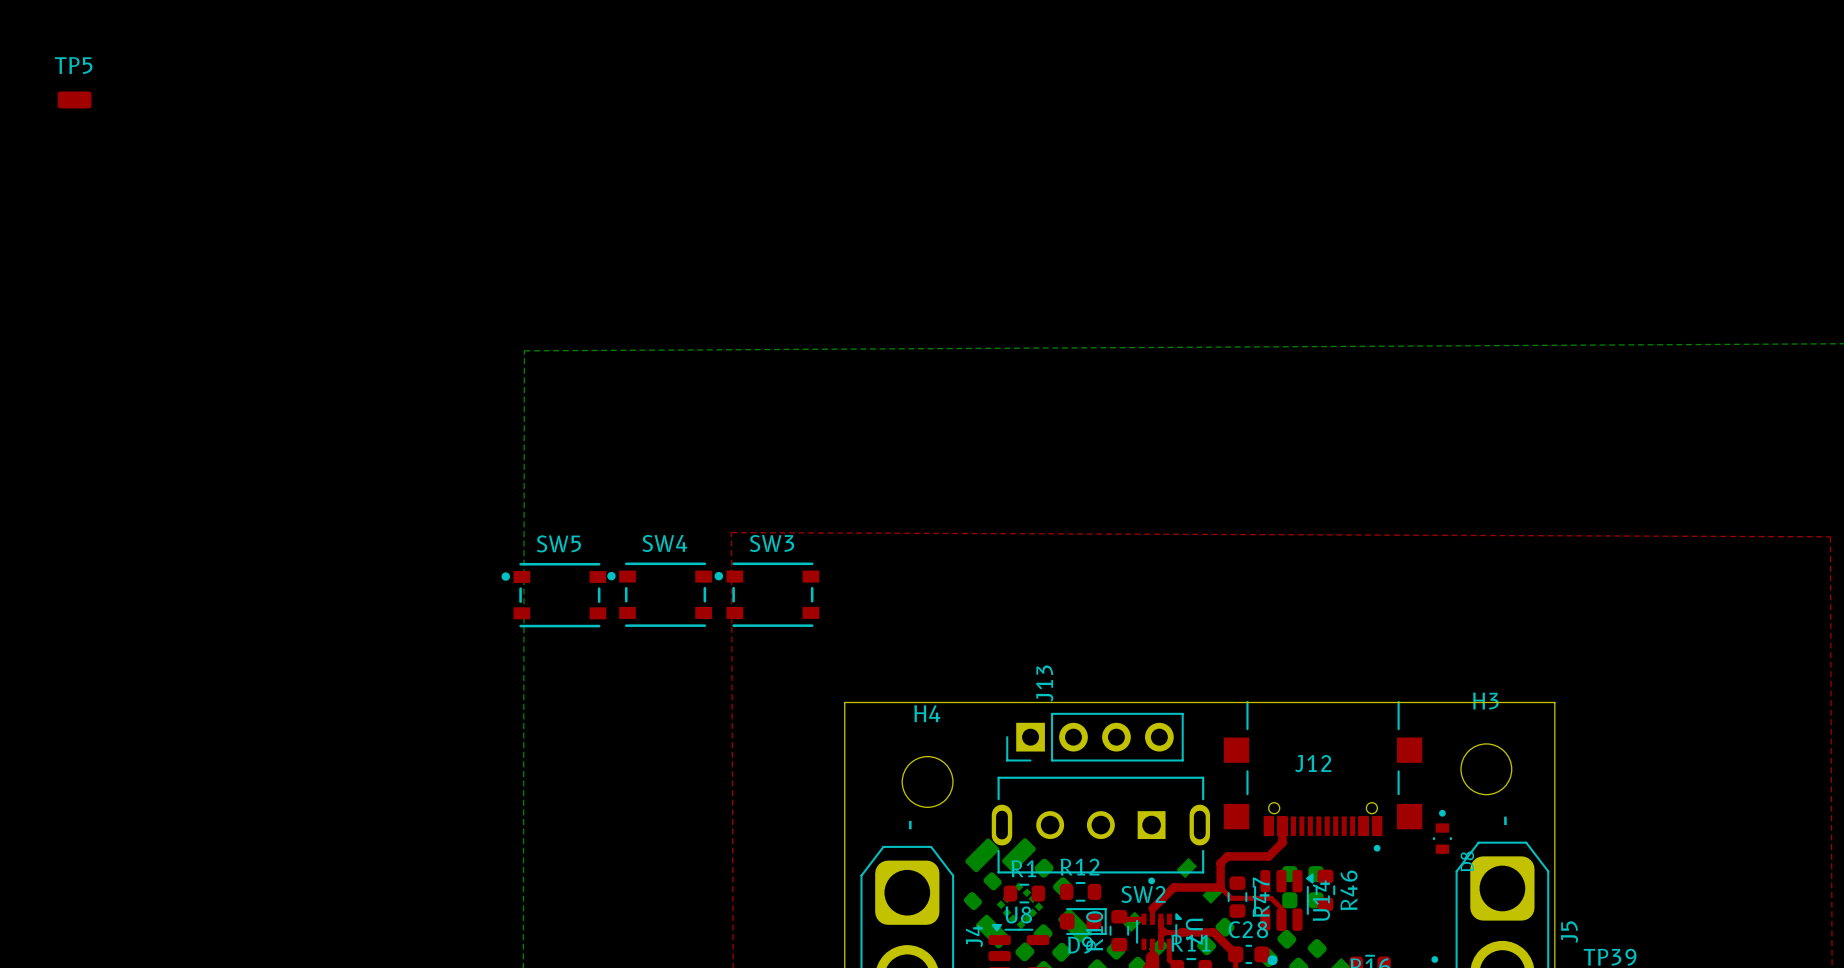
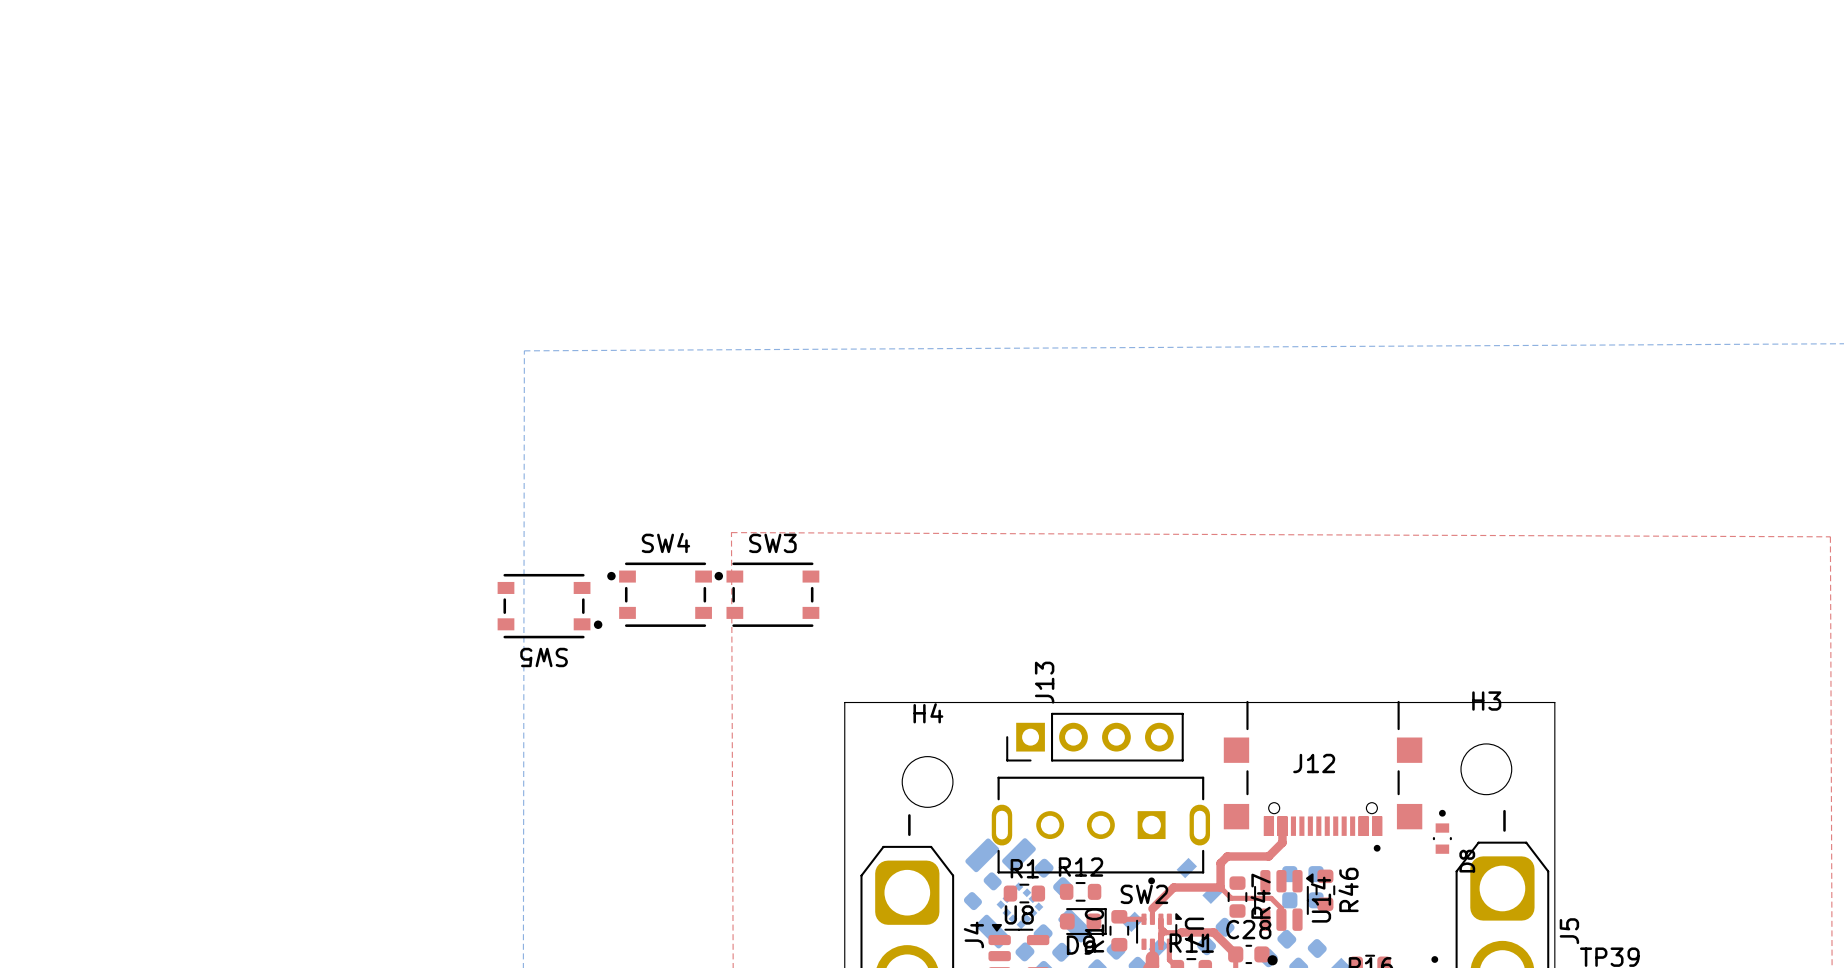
TP5: (74, 99) -> none
SW5 rotation: 0° (553, 595) -> 180° (549, 606)

